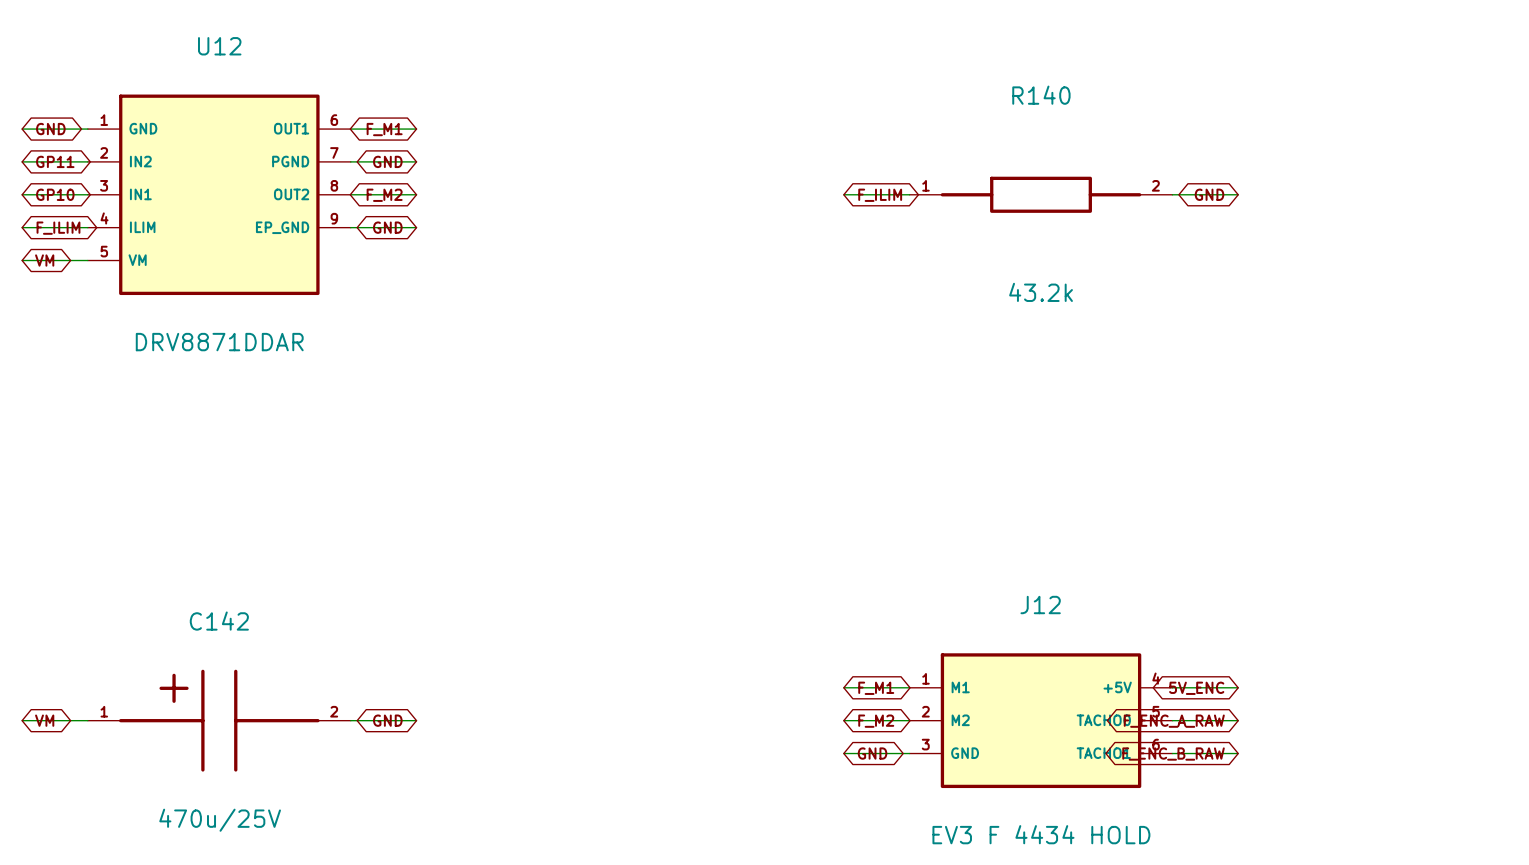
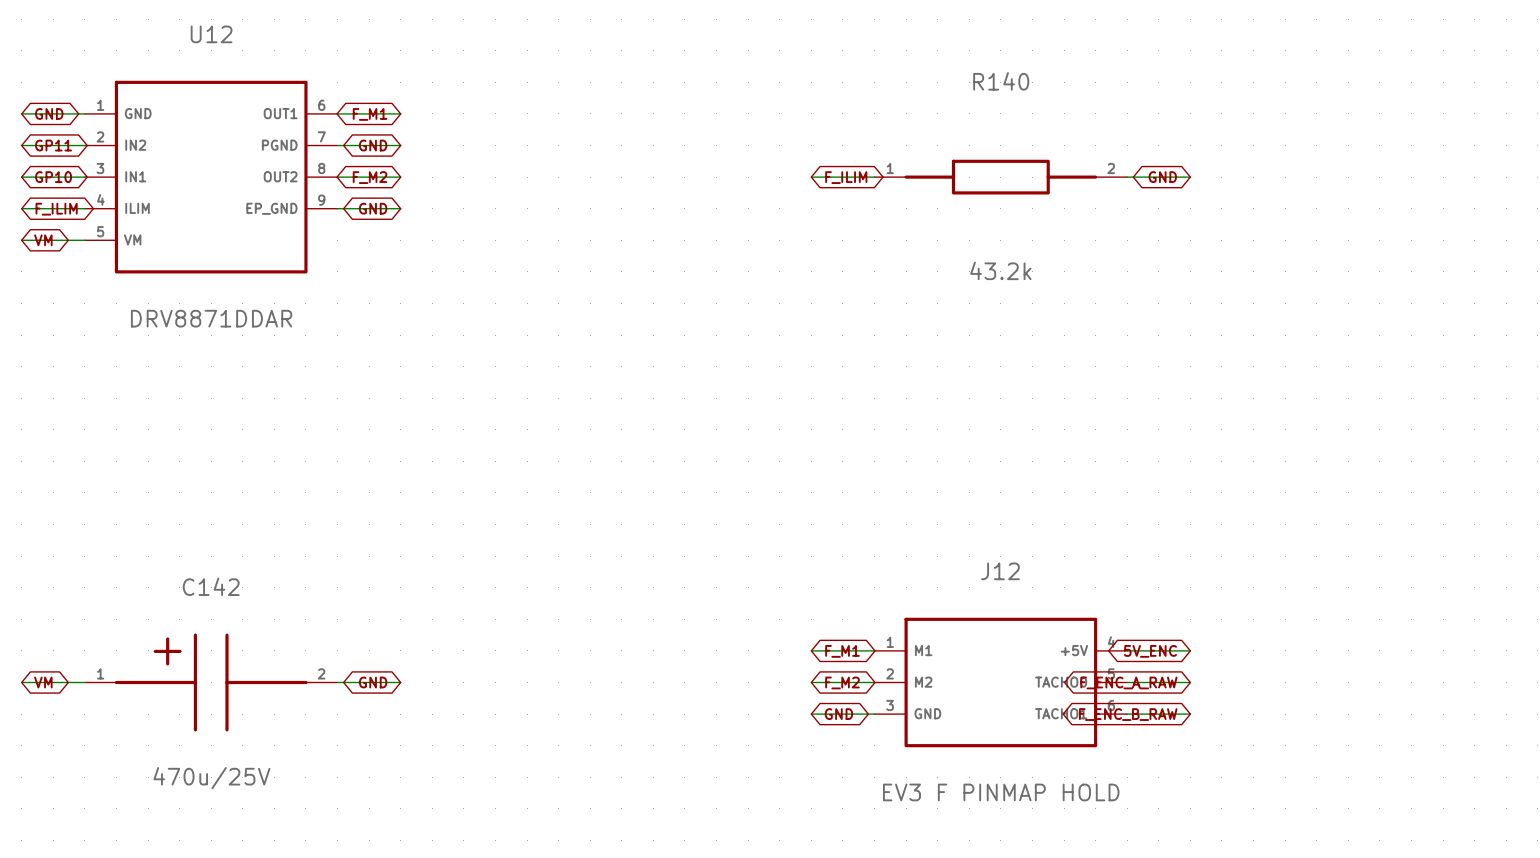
J12 value: EV3 F 4434 HOLD (1041, 834) -> EV3 F PINMAP HOLD (1001, 792)

